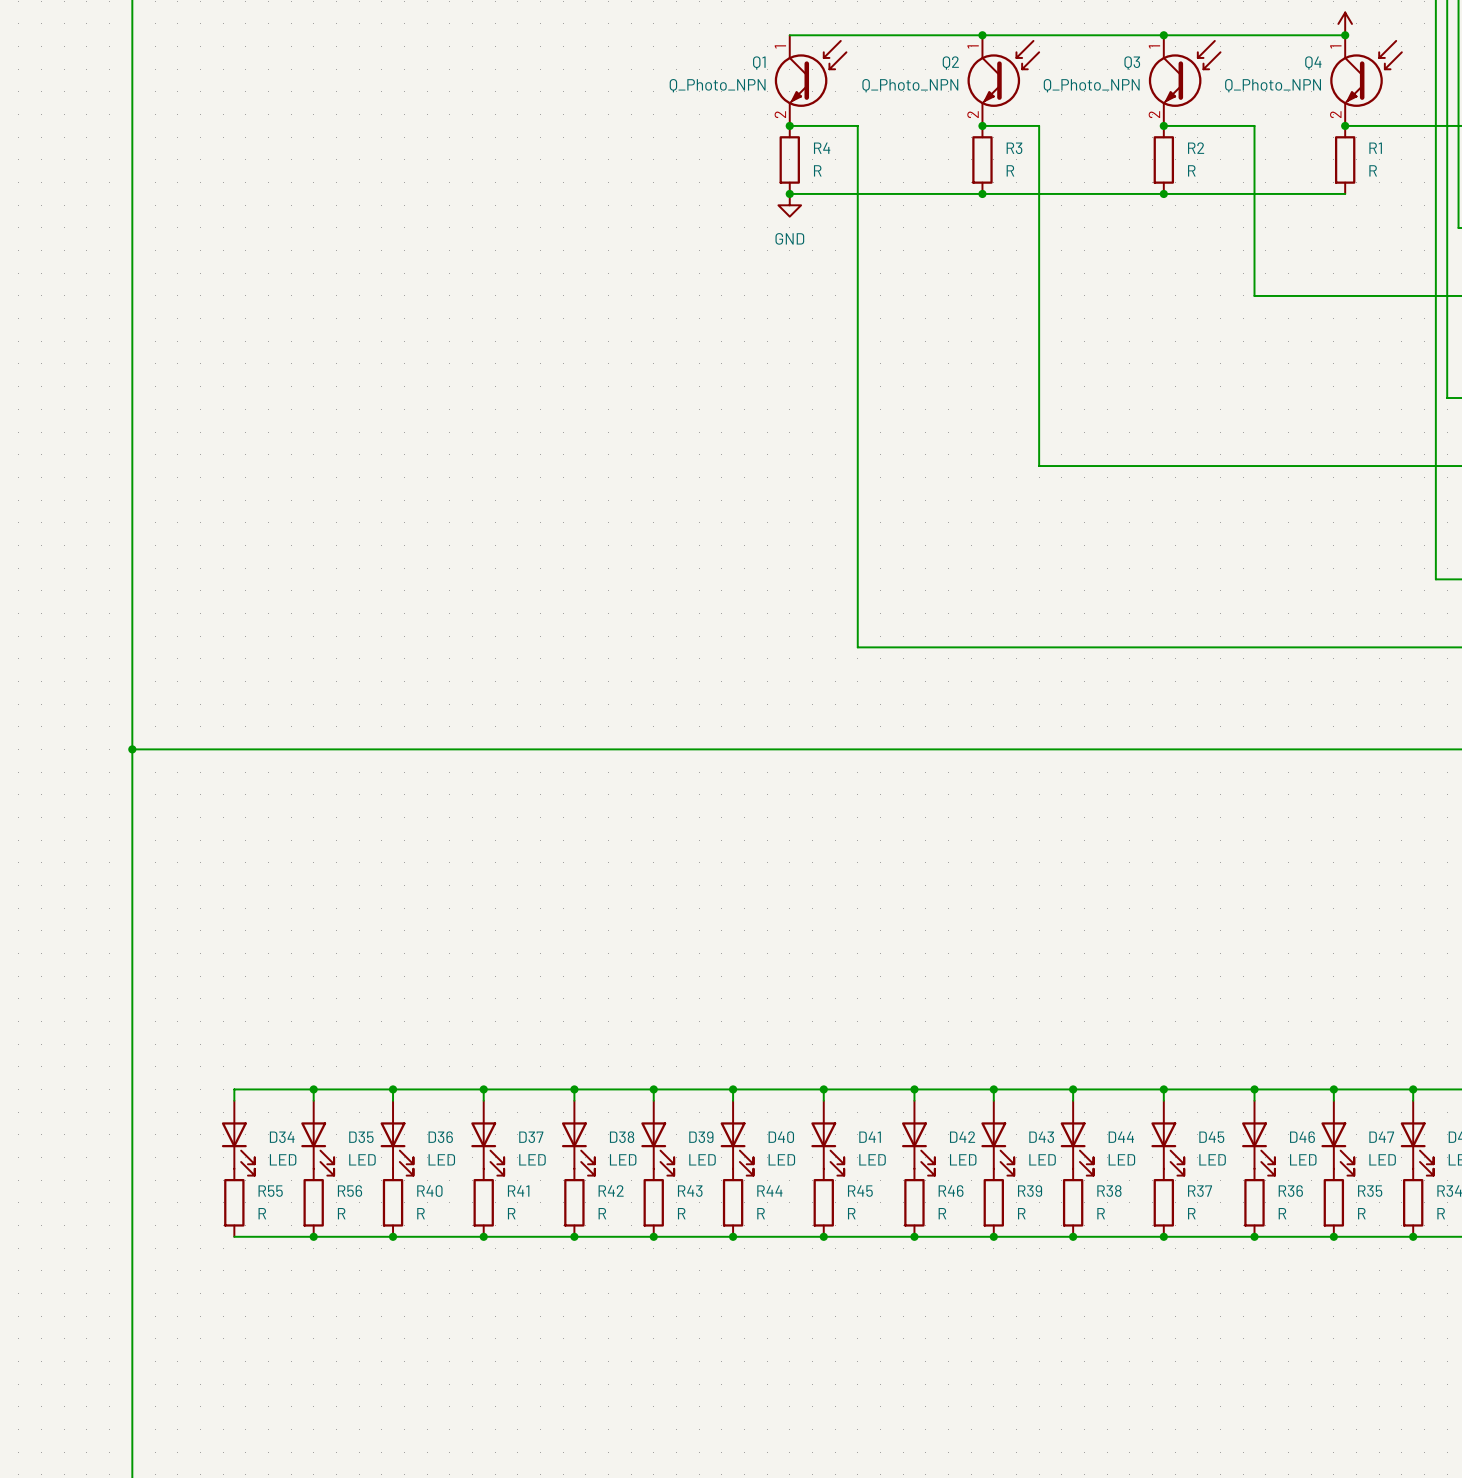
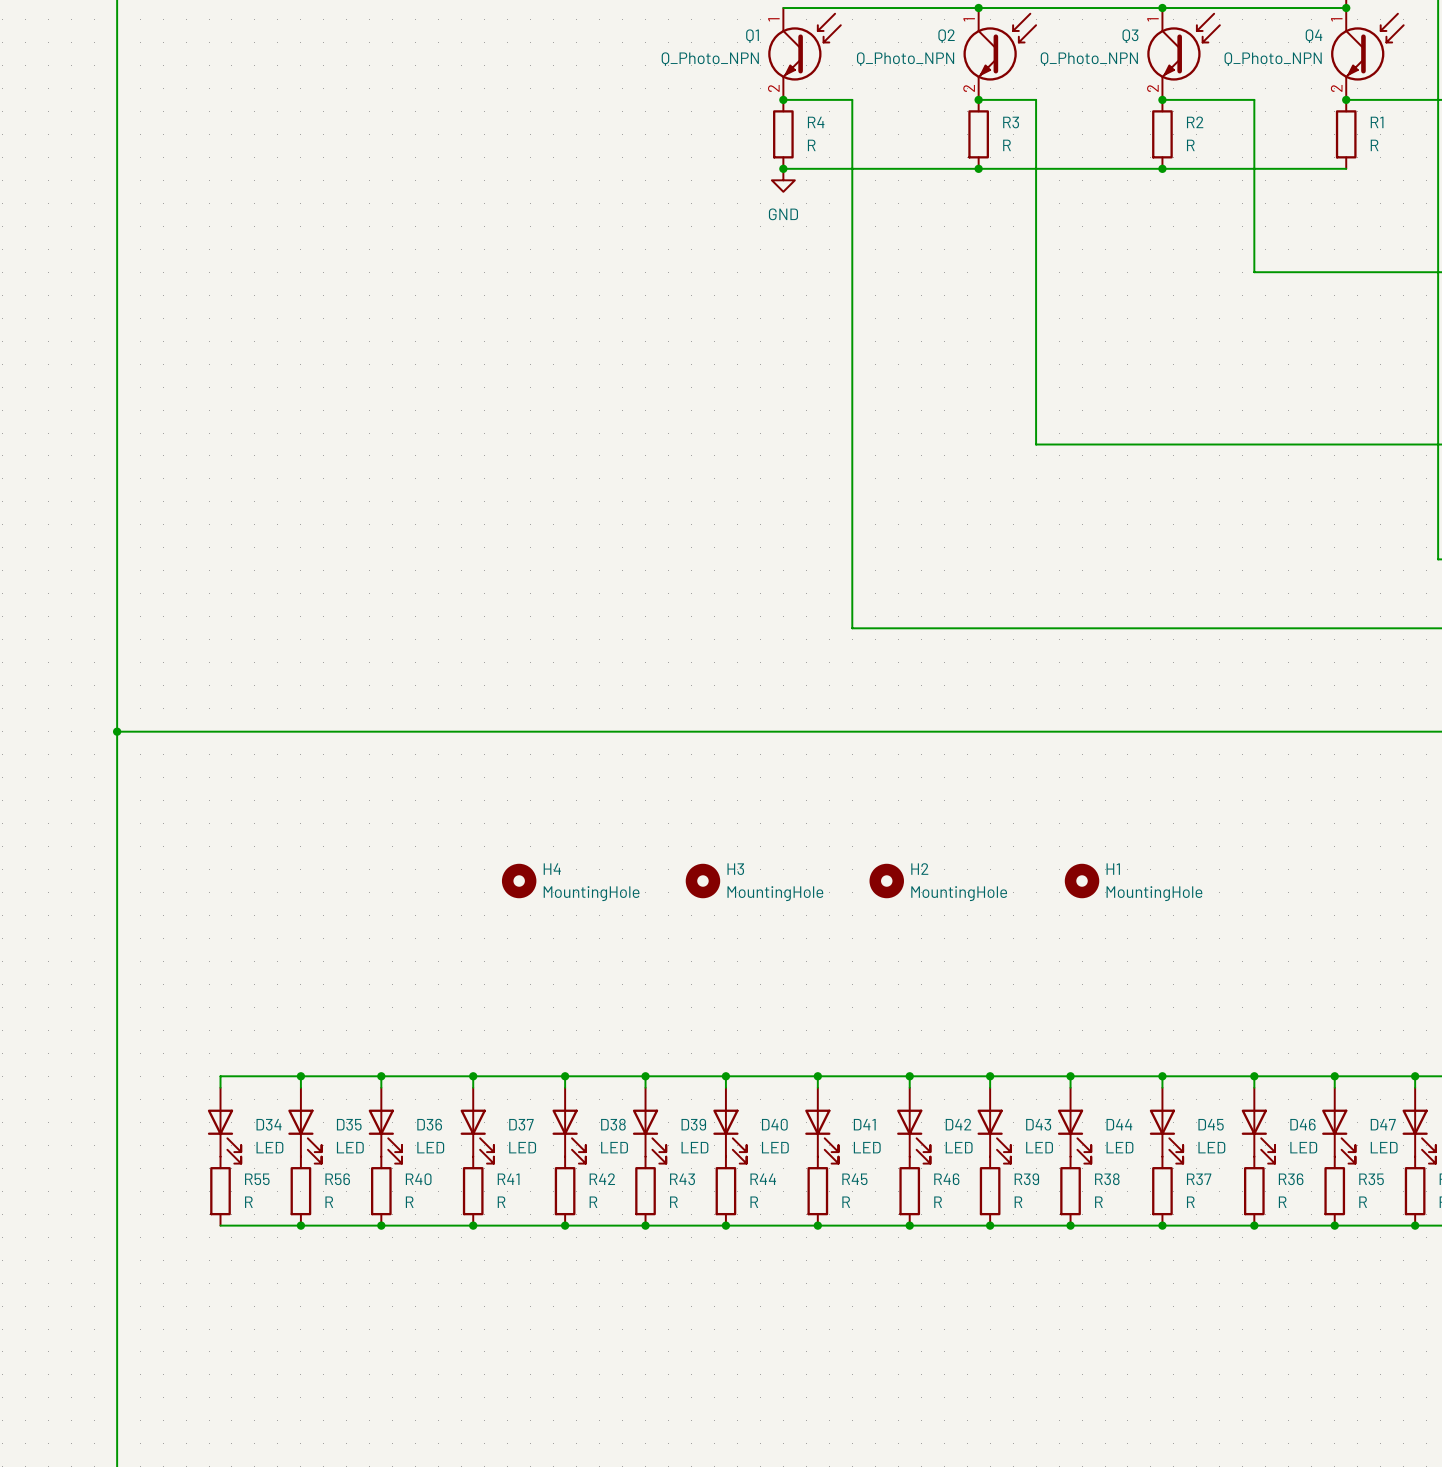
H4: none -> MountingHole (519, 881)
H3: none -> MountingHole (702, 881)
H2: none -> MountingHole (886, 881)
H1: none -> MountingHole (1082, 881)

